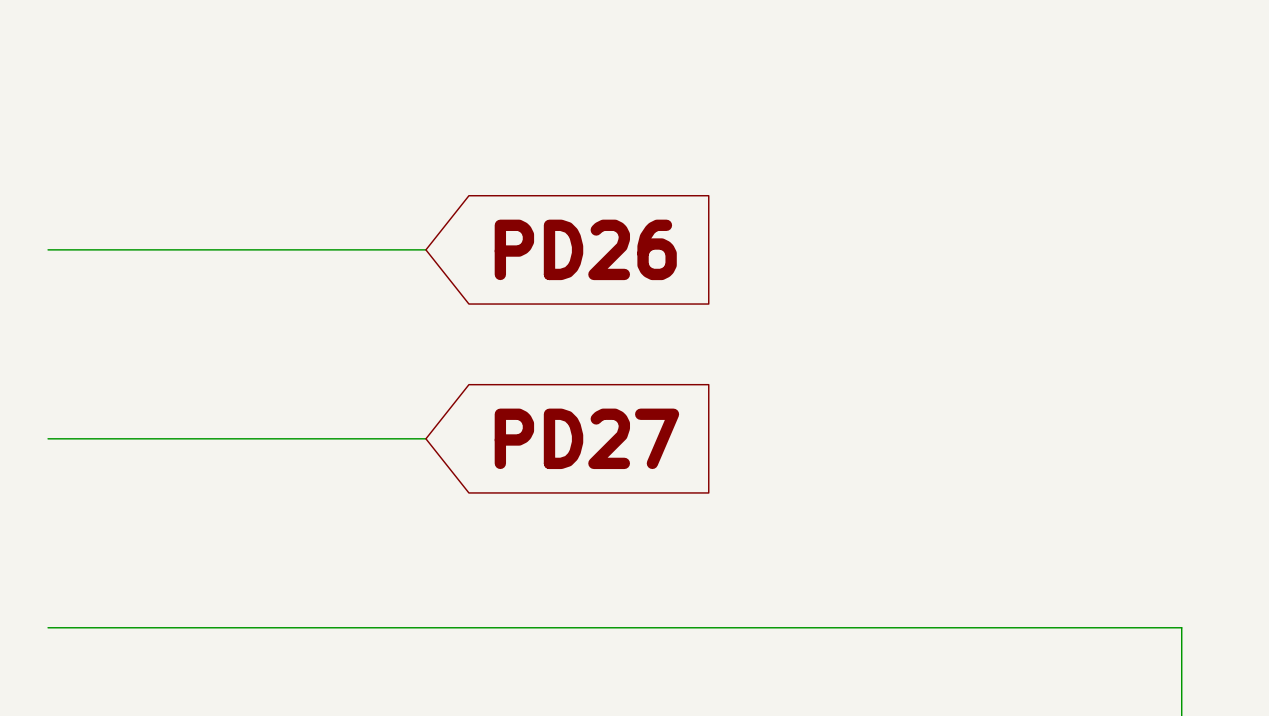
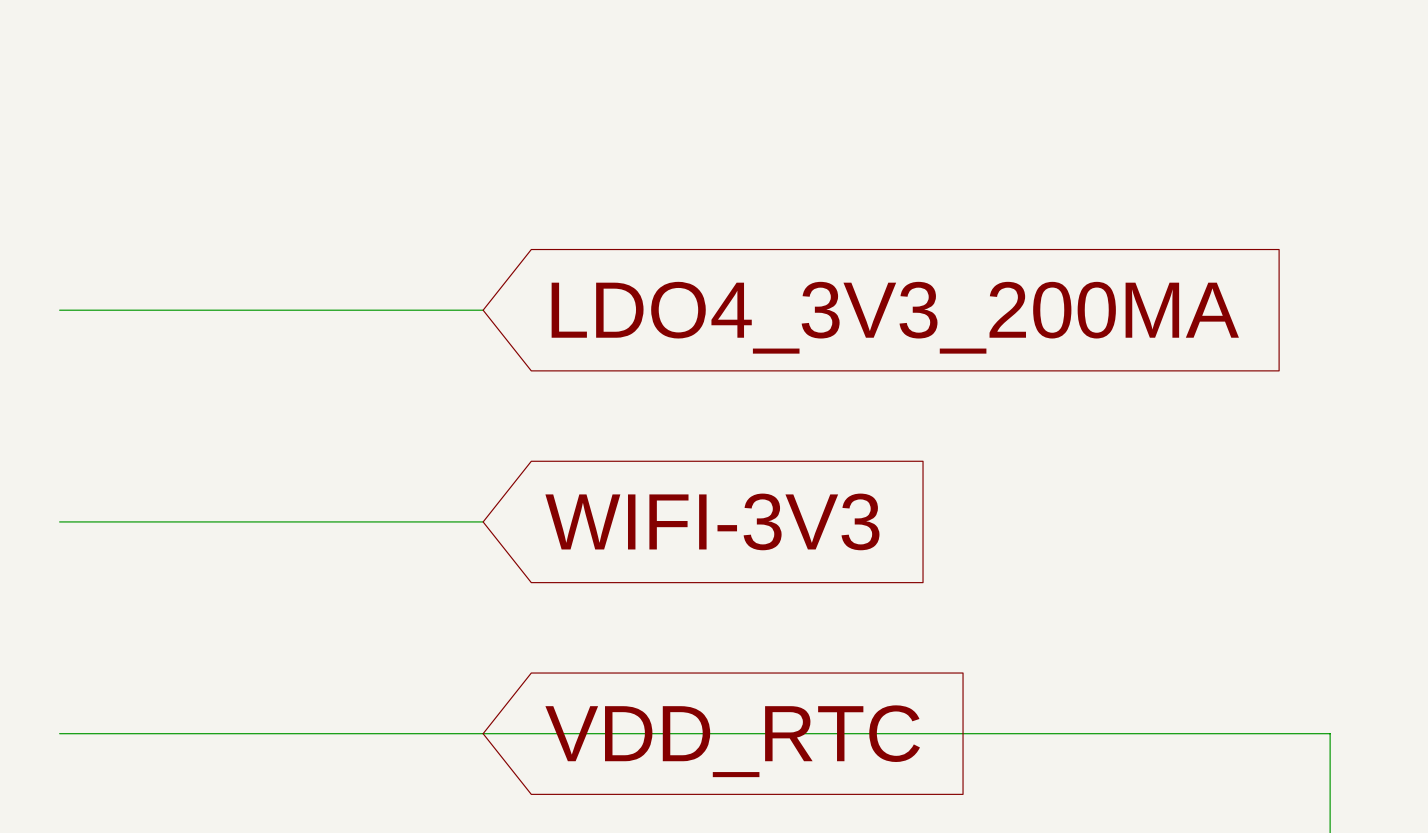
global label: PD26 (585, 249) -> LDO4_3V3_200MA (895, 317)
global label: PD27 (586, 438) -> WIFI-3V3 (712, 521)
global label: none -> VDD_RTC (732, 741)

